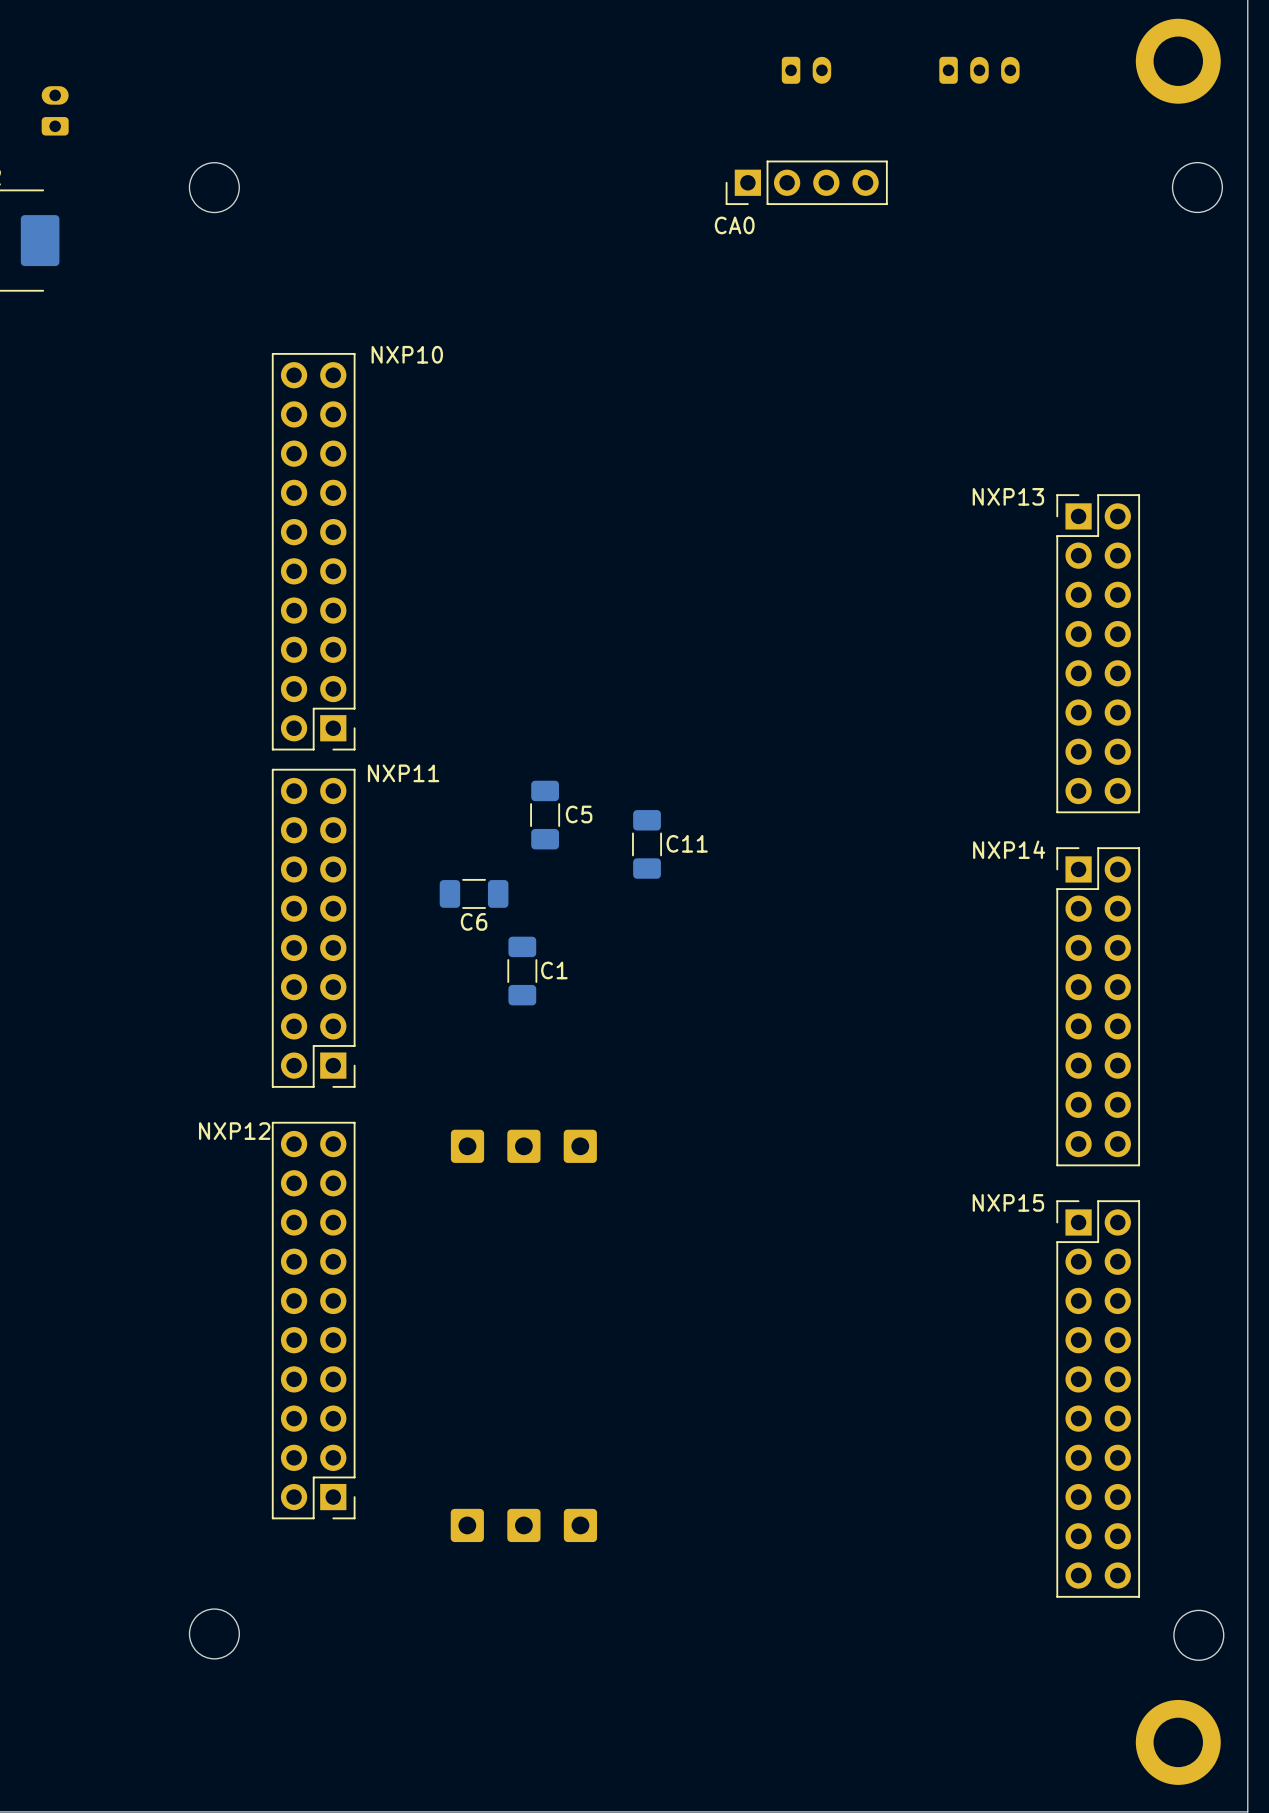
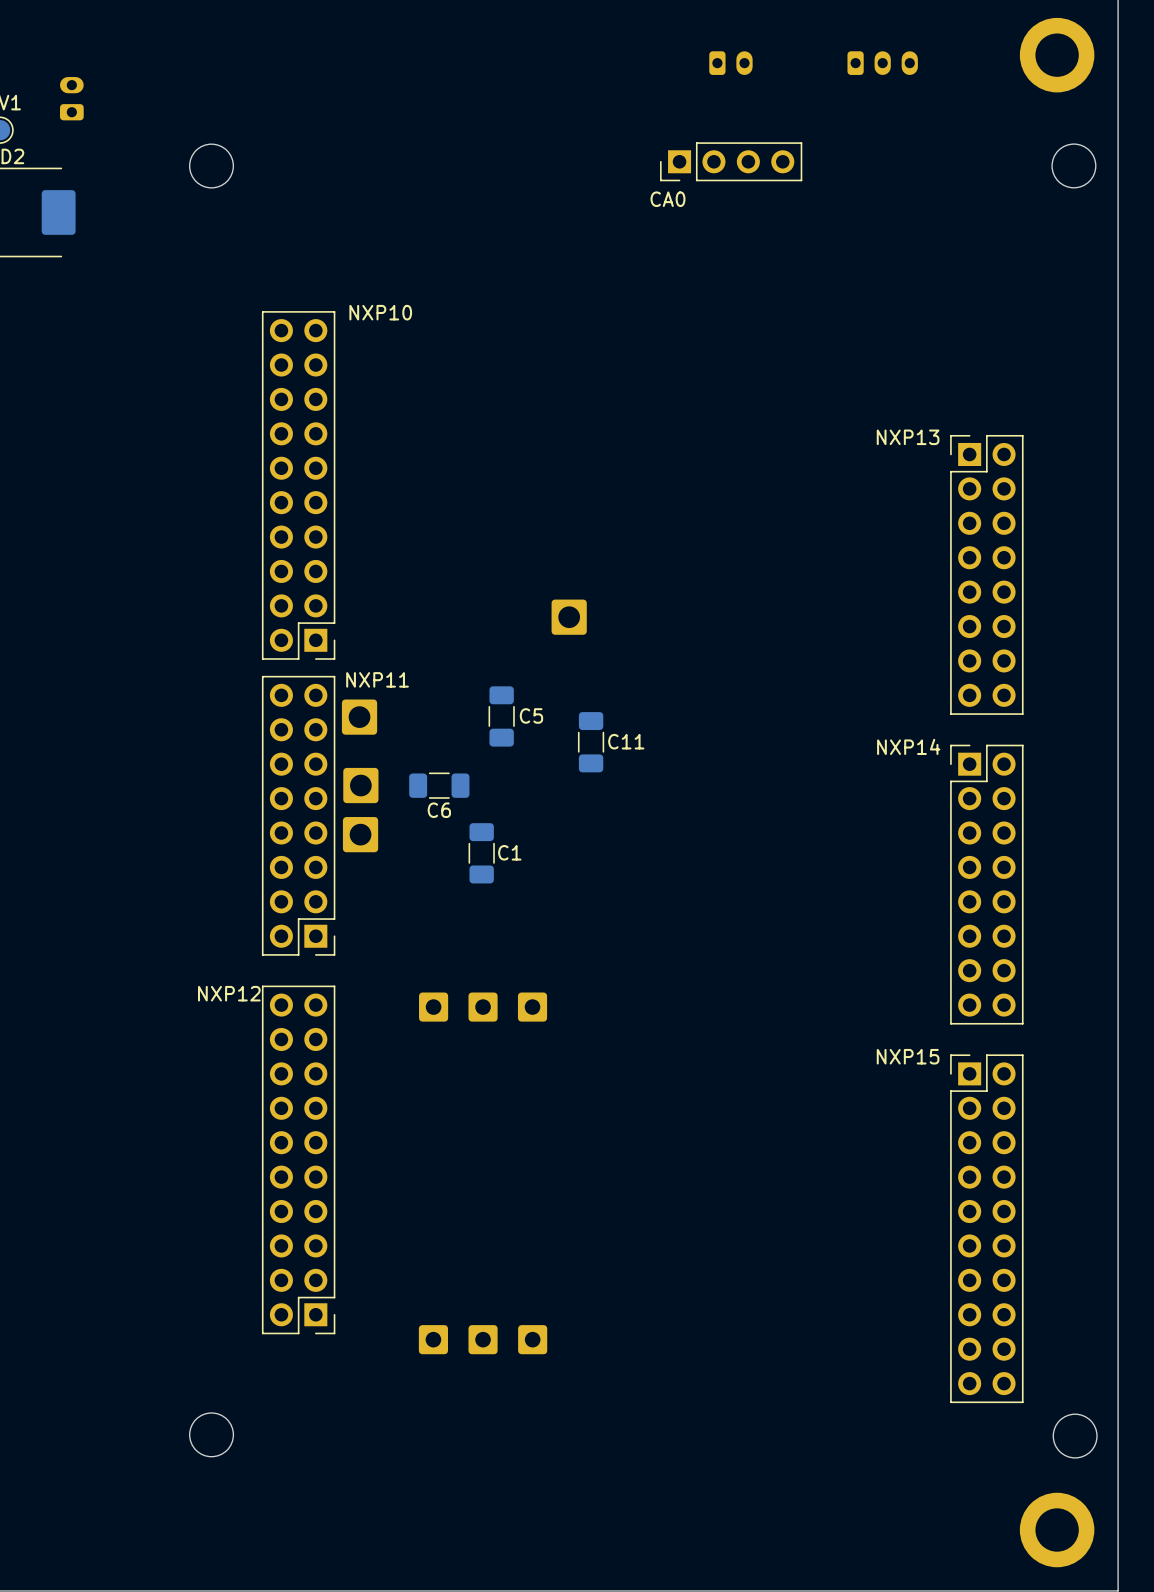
part: none -> (569, 617)
part: none -> (359, 717)
part: none -> (360, 785)
part: none -> (360, 834)

